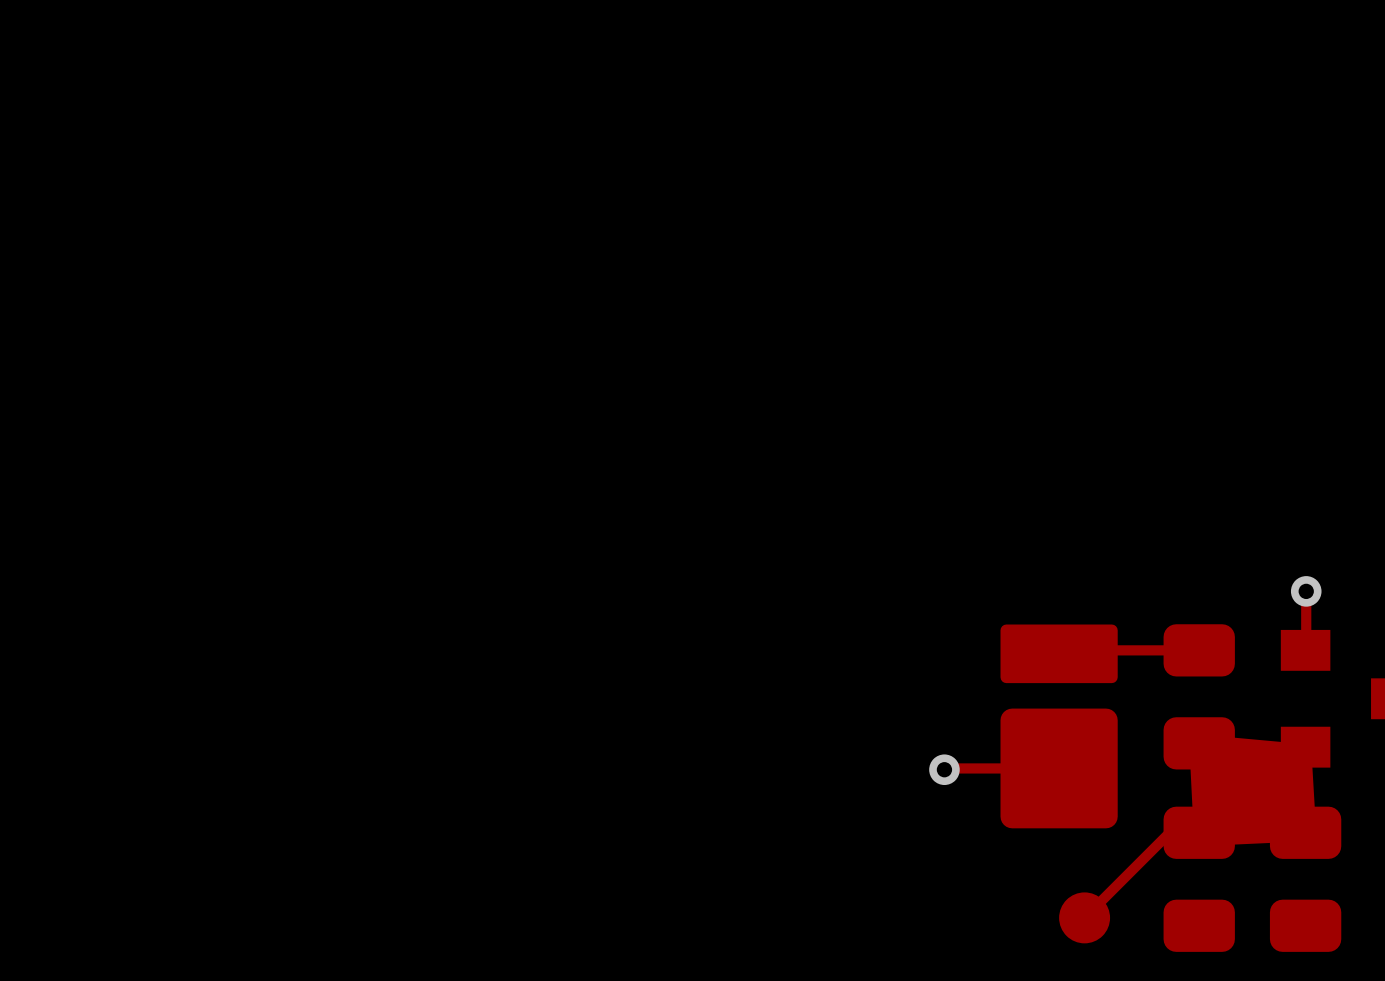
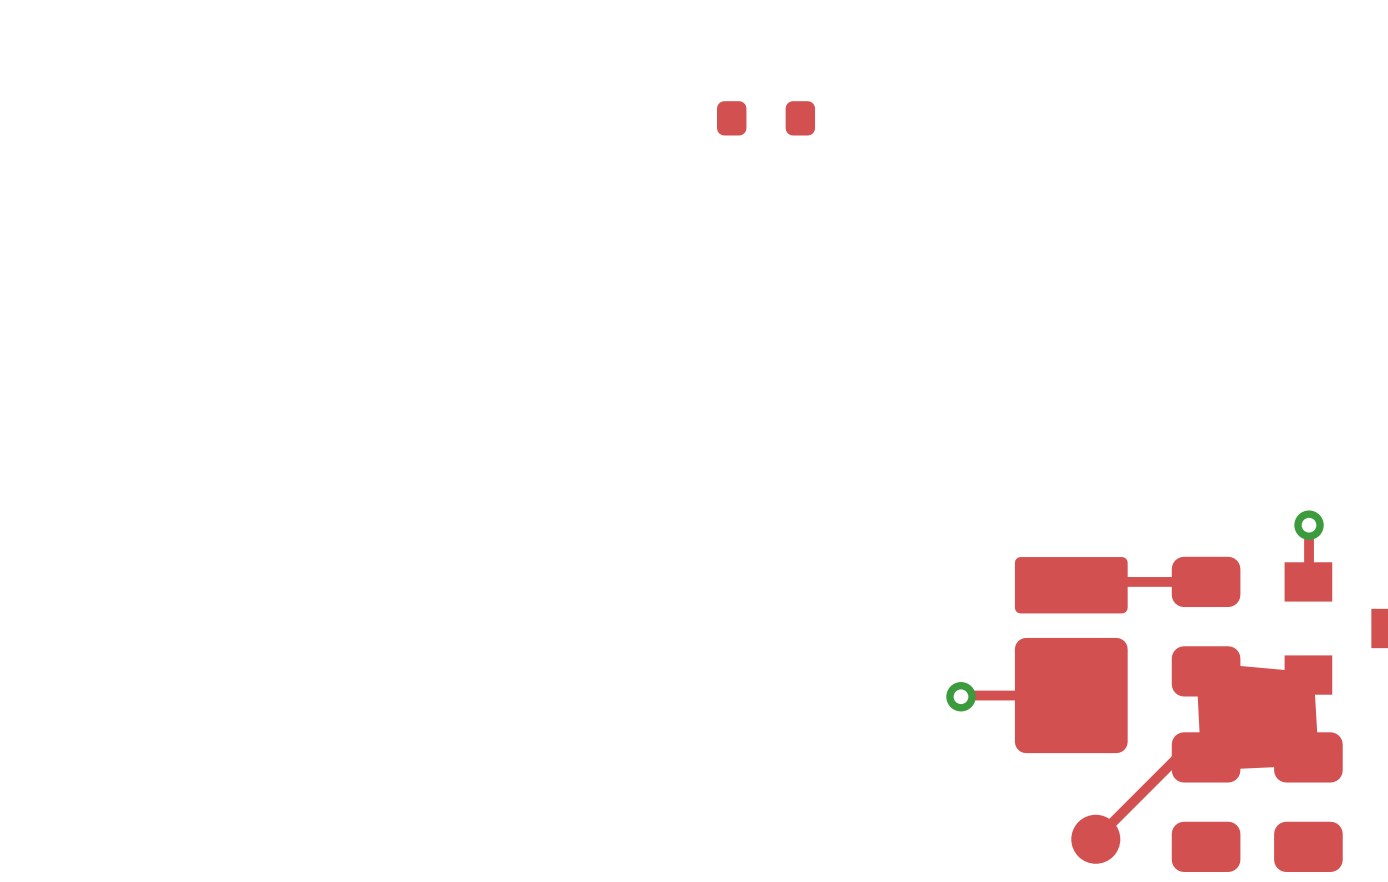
part: none -> (766, 118)

